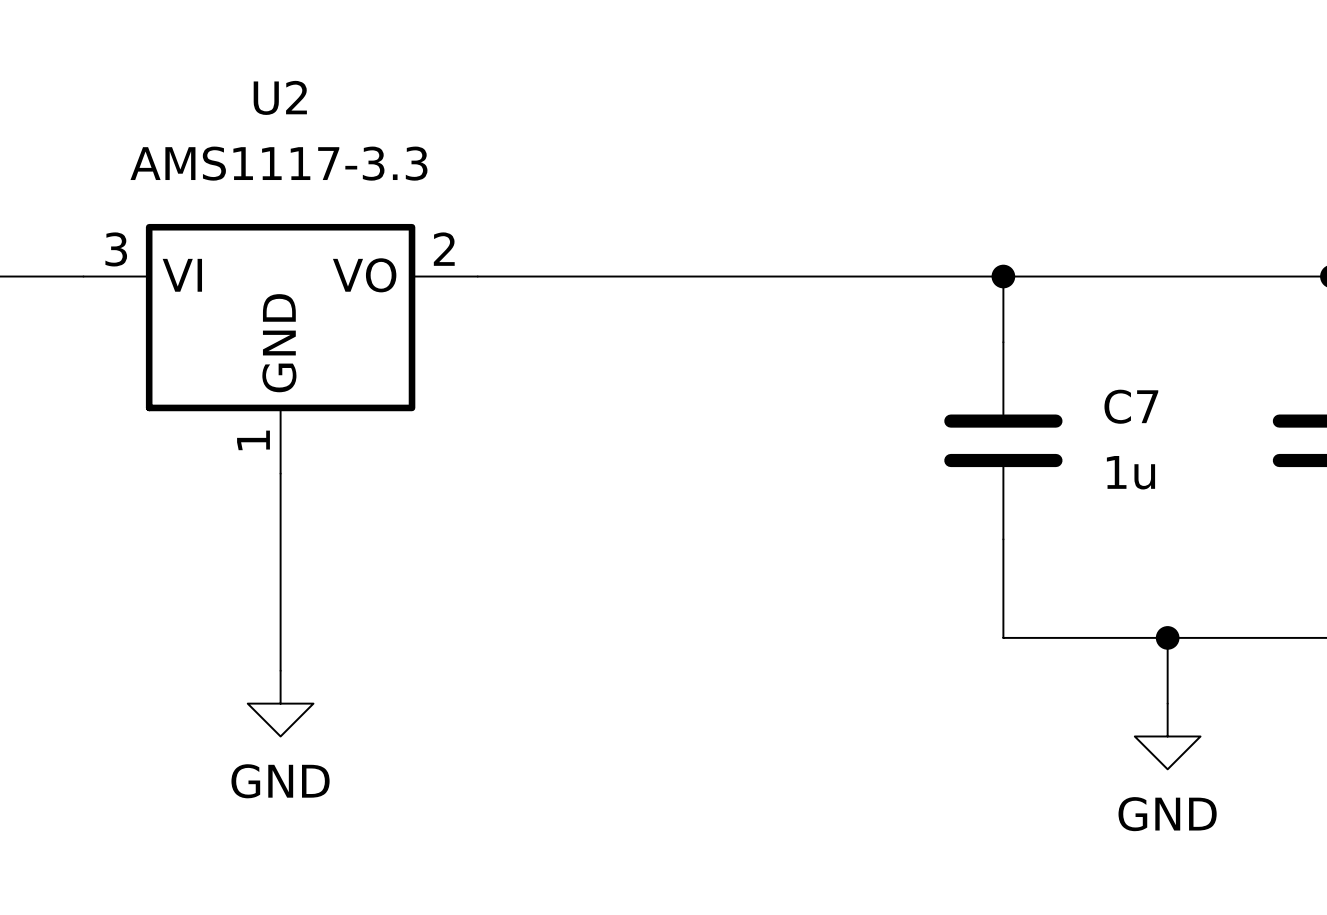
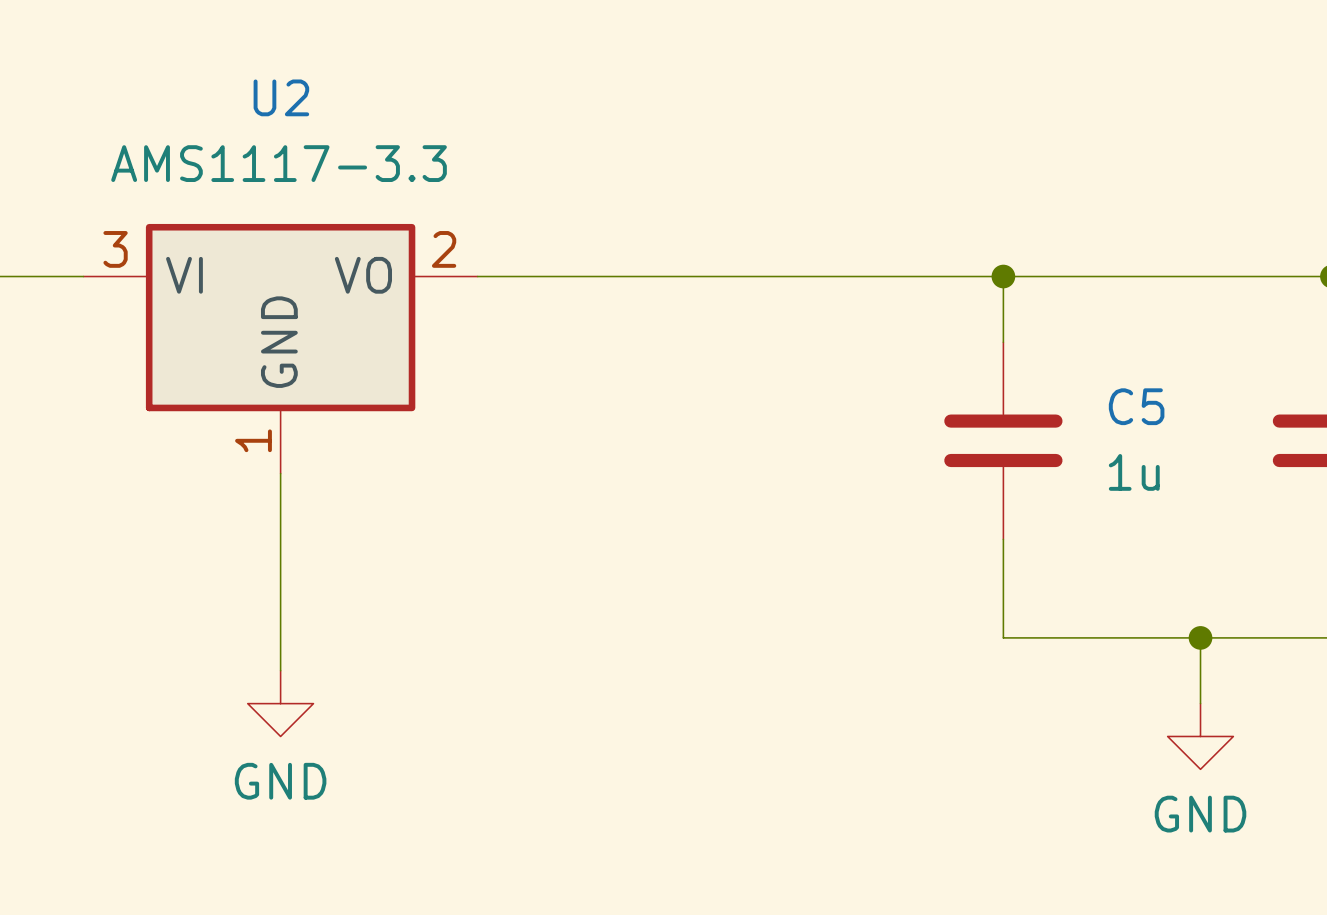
C7 name: C7 (1131, 406) -> C5 (1136, 406)
wire: (1167, 637) (1167, 703) -> (1200, 637) (1200, 703)
junction position: (1167, 637) -> (1200, 637)
power symbol position: GND (1167, 736) -> GND (1200, 736)

